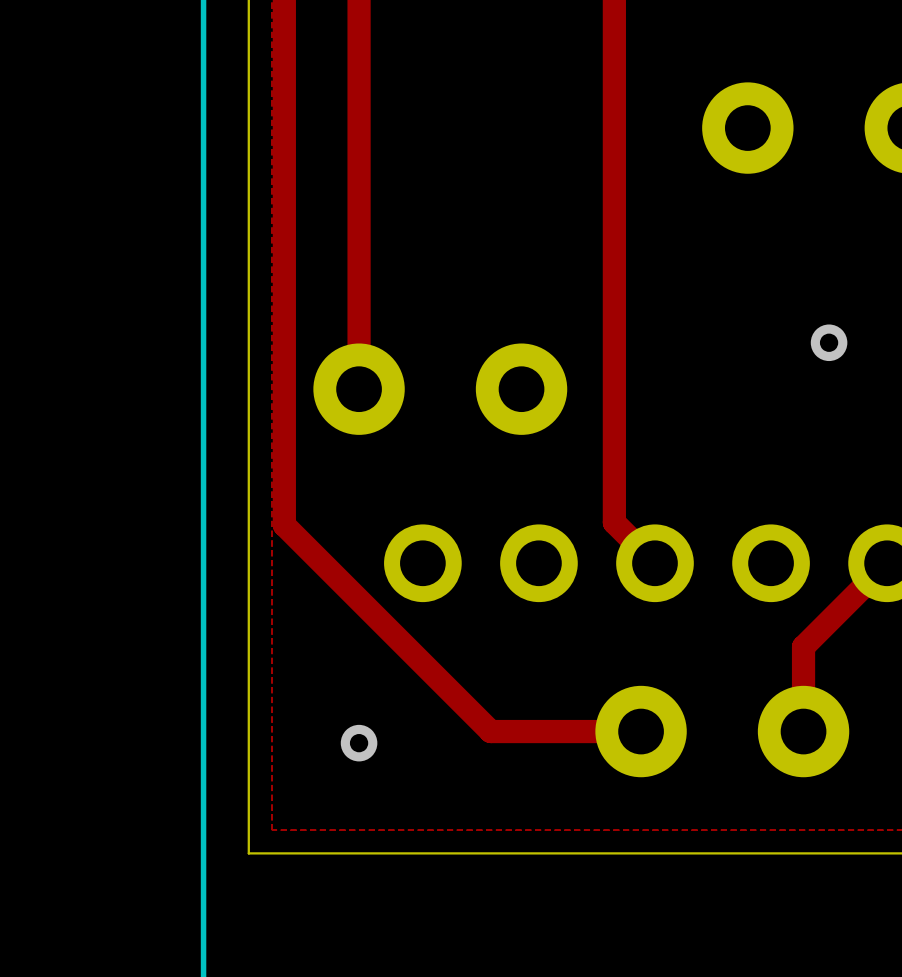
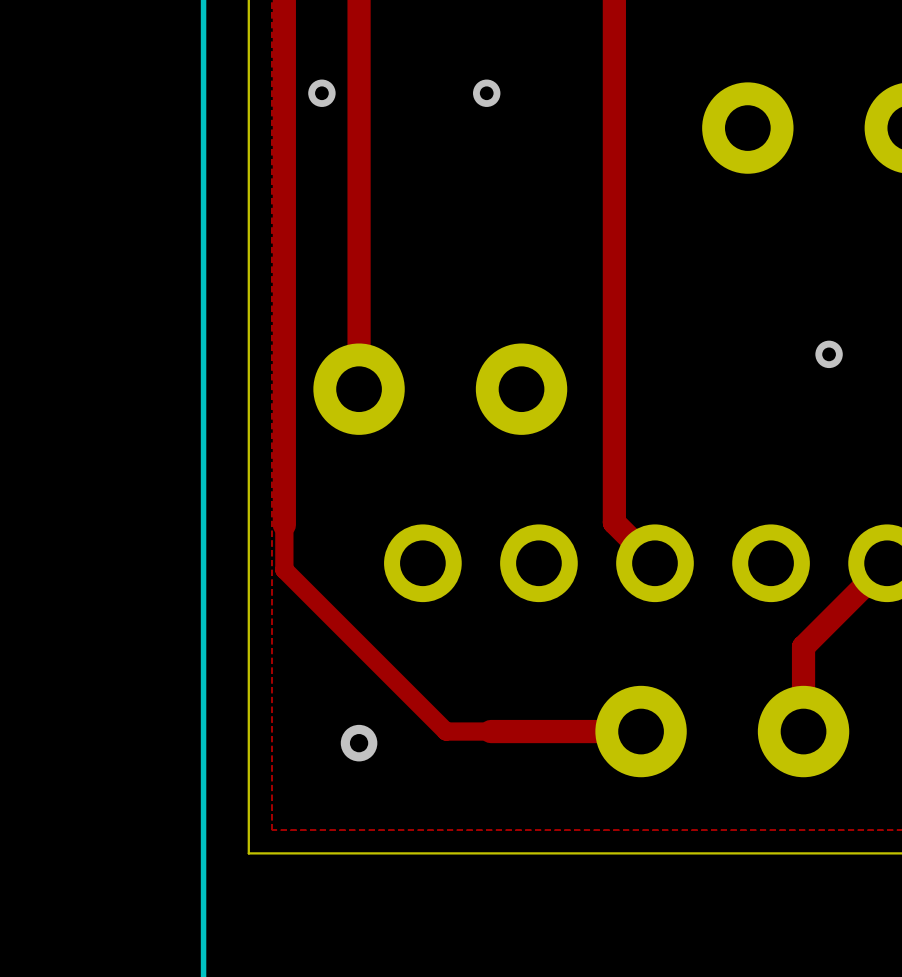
via: none -> (321, 93)
via: none -> (486, 93)
via size: [810, 324, 848, 362] -> [815, 340, 843, 369]
track: (284, 525) (490, 731) -> (284, 525) (284, 569) (446, 731) (490, 731)

